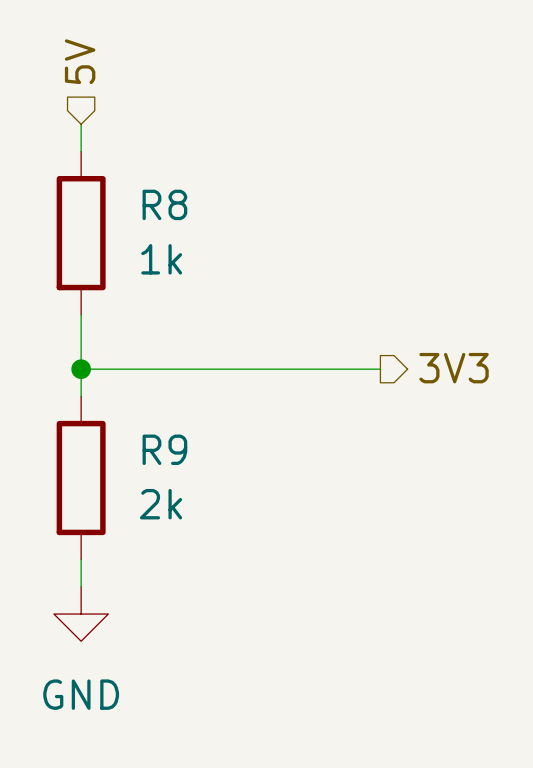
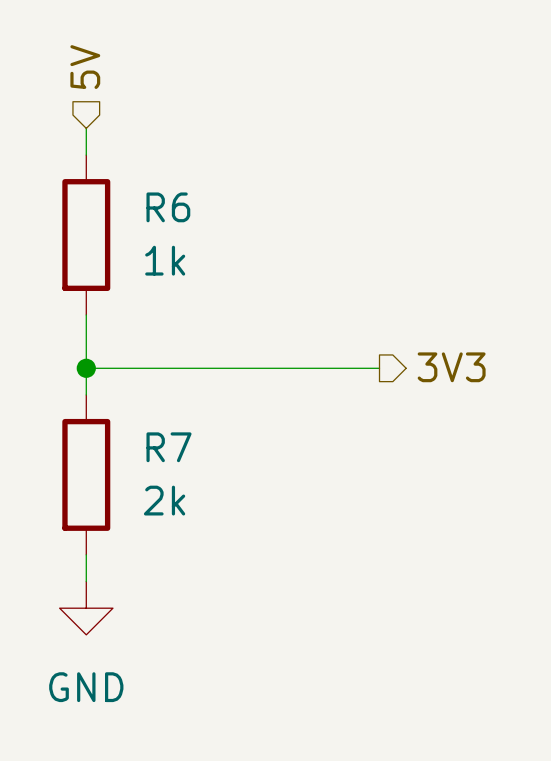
R8 name: R8 (164, 204) -> R6 (168, 207)
R9 name: R9 (164, 449) -> R7 (169, 447)

